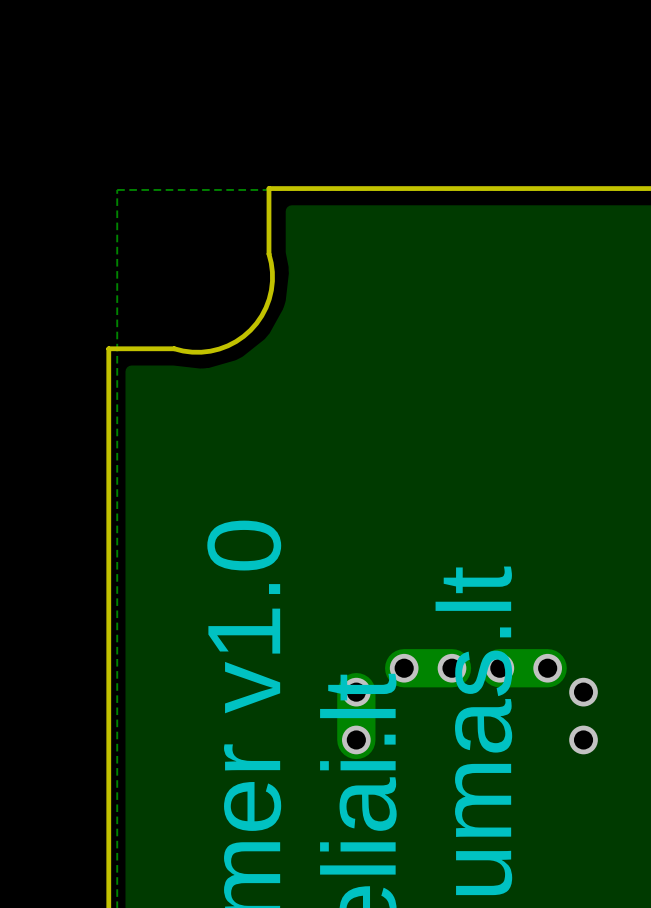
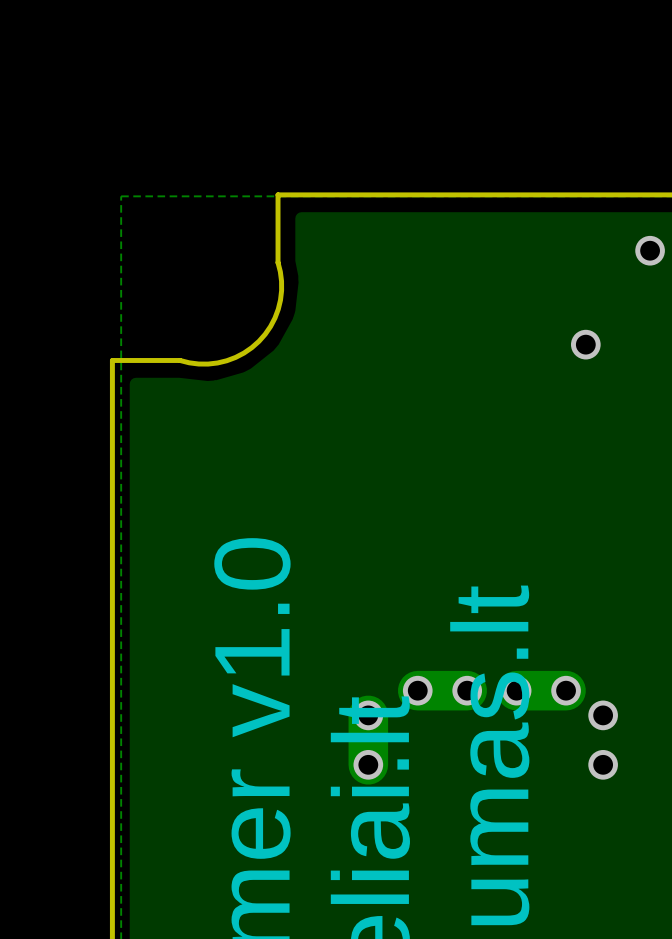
via: none -> (650, 250)
via: none -> (585, 344)

